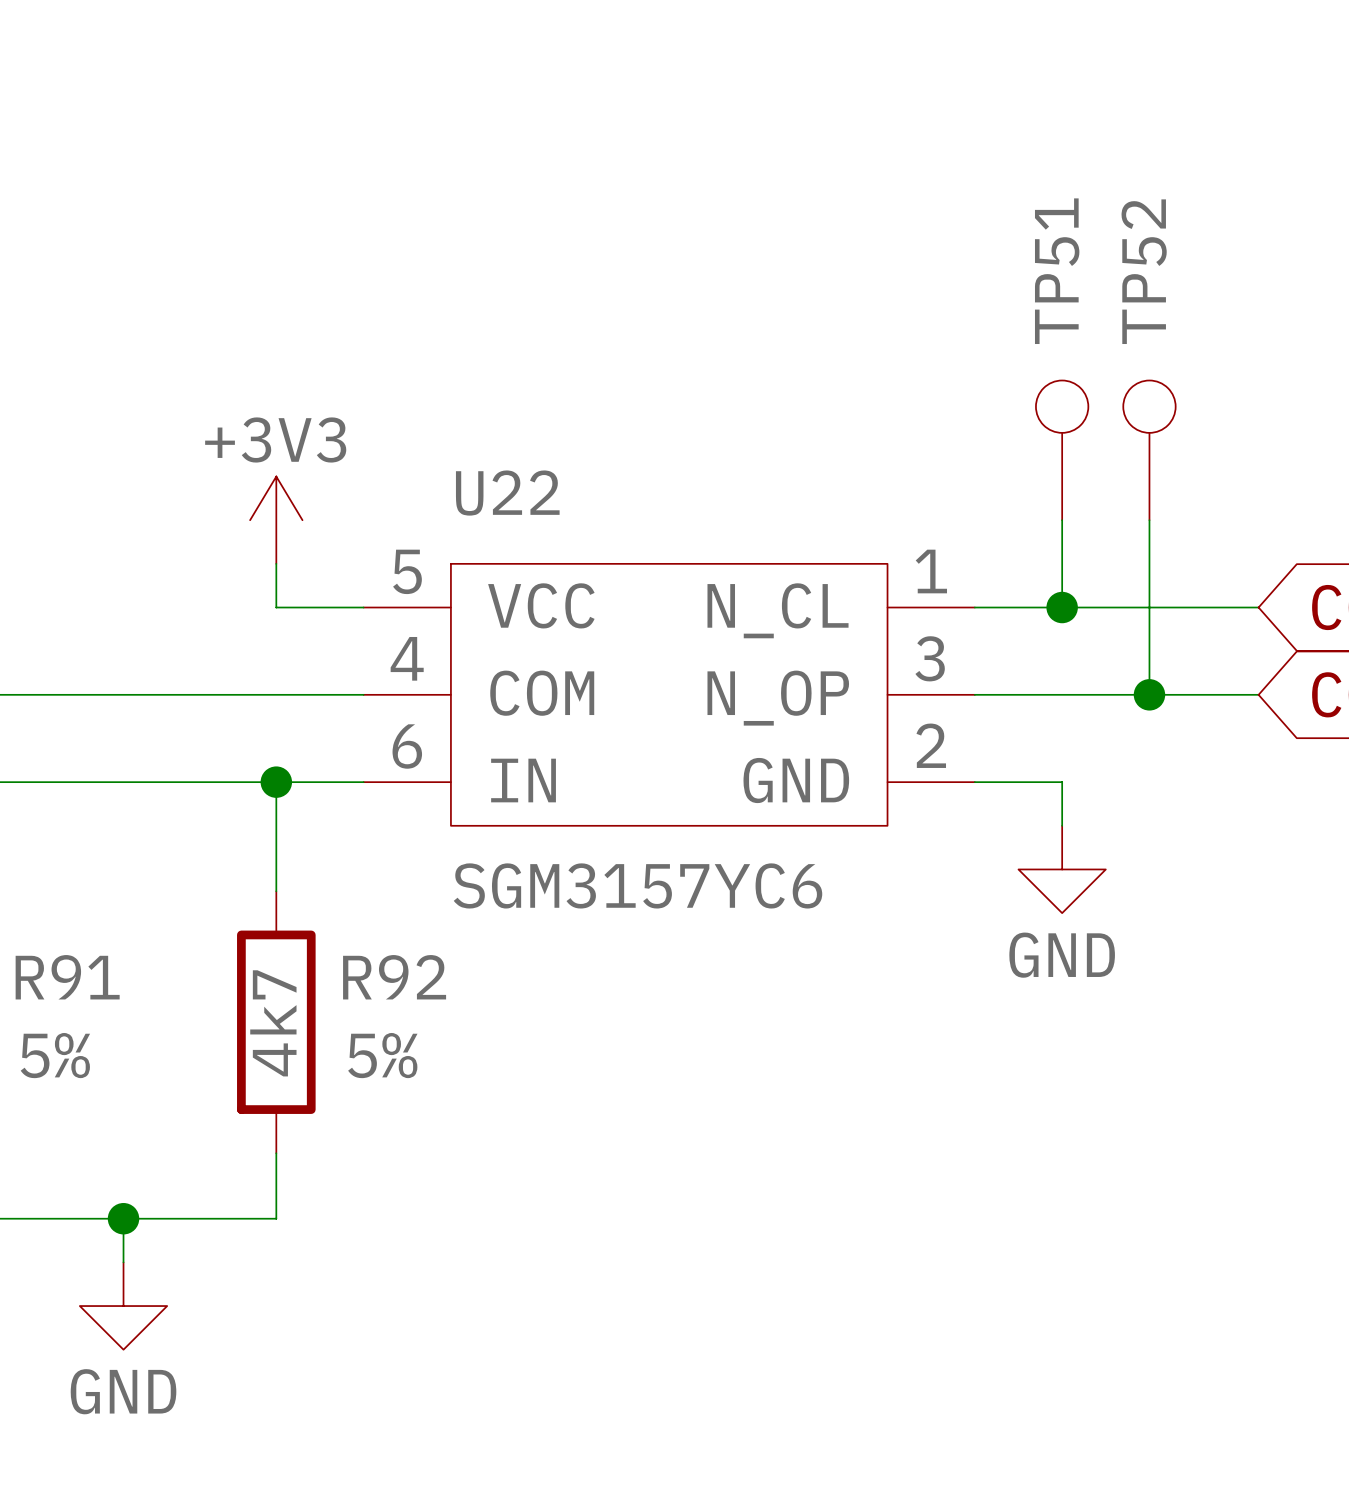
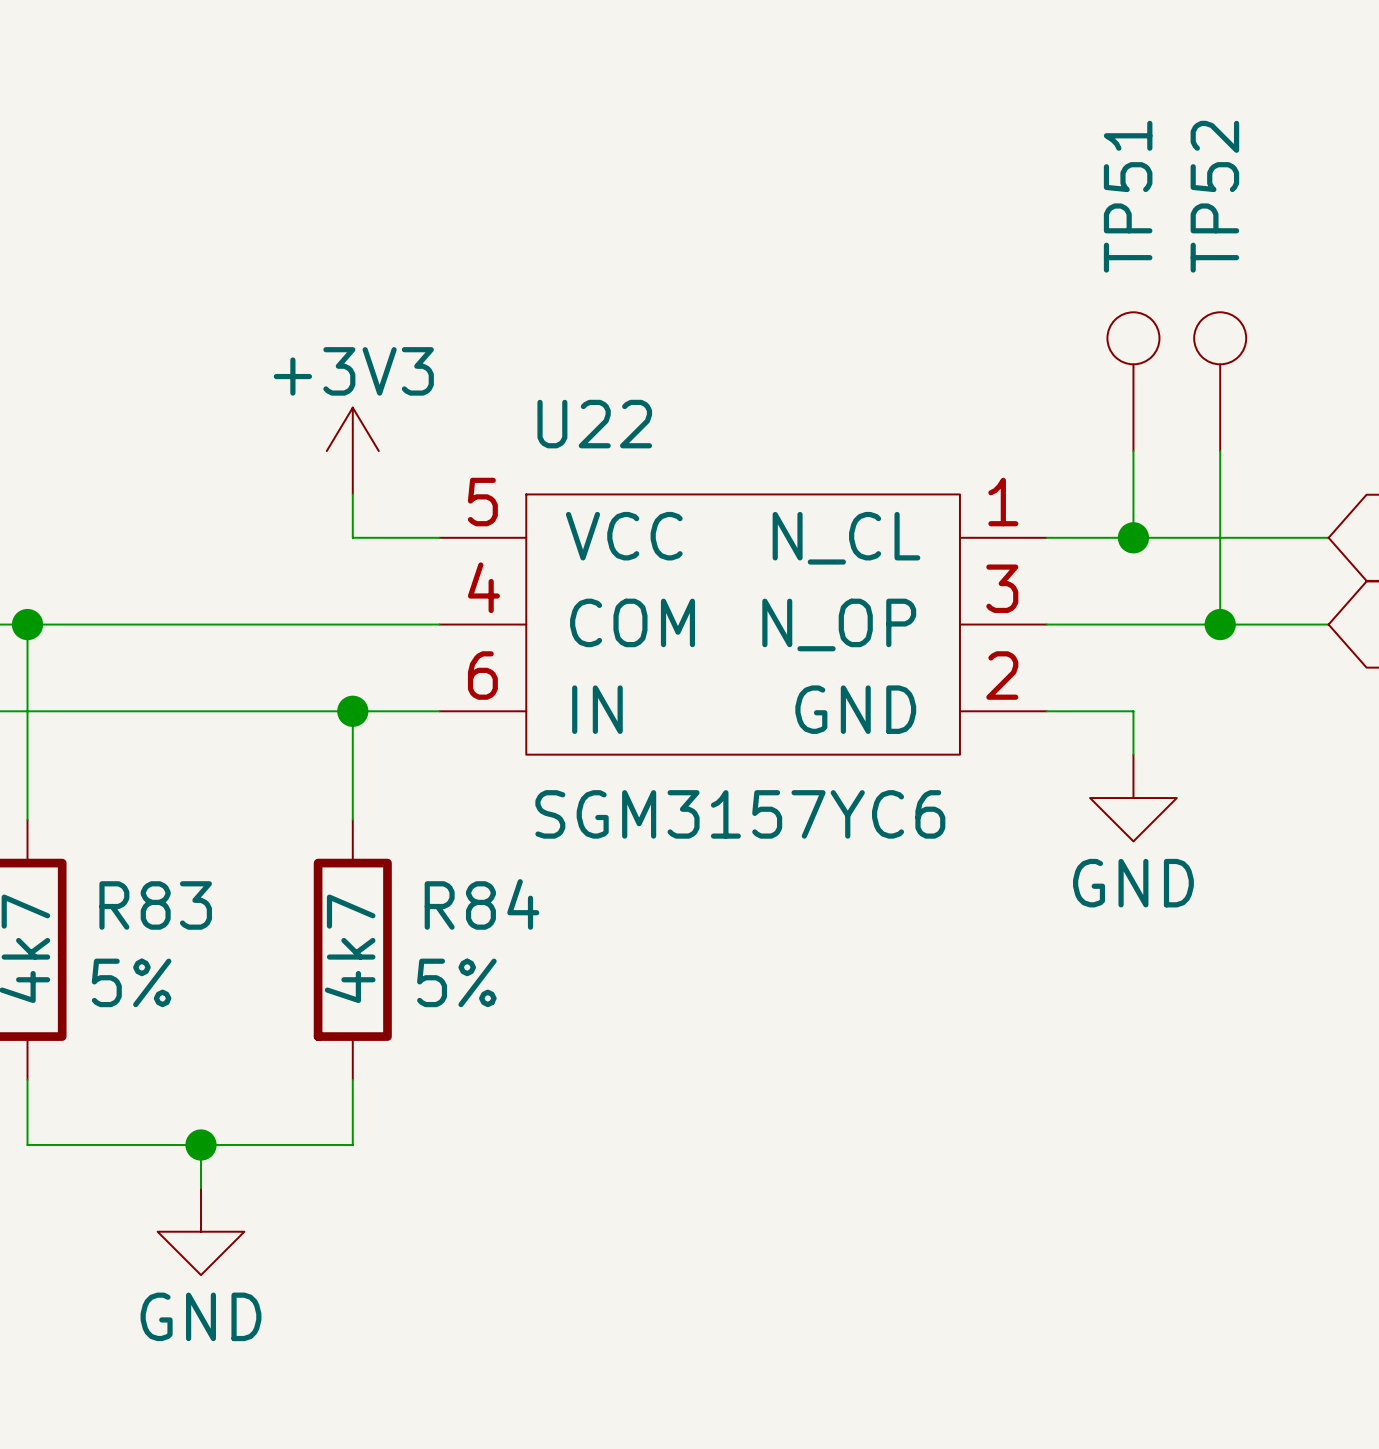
R91 name: R91 (67, 977) -> R83 (155, 905)
R92 name: R92 (394, 977) -> R84 (481, 904)

